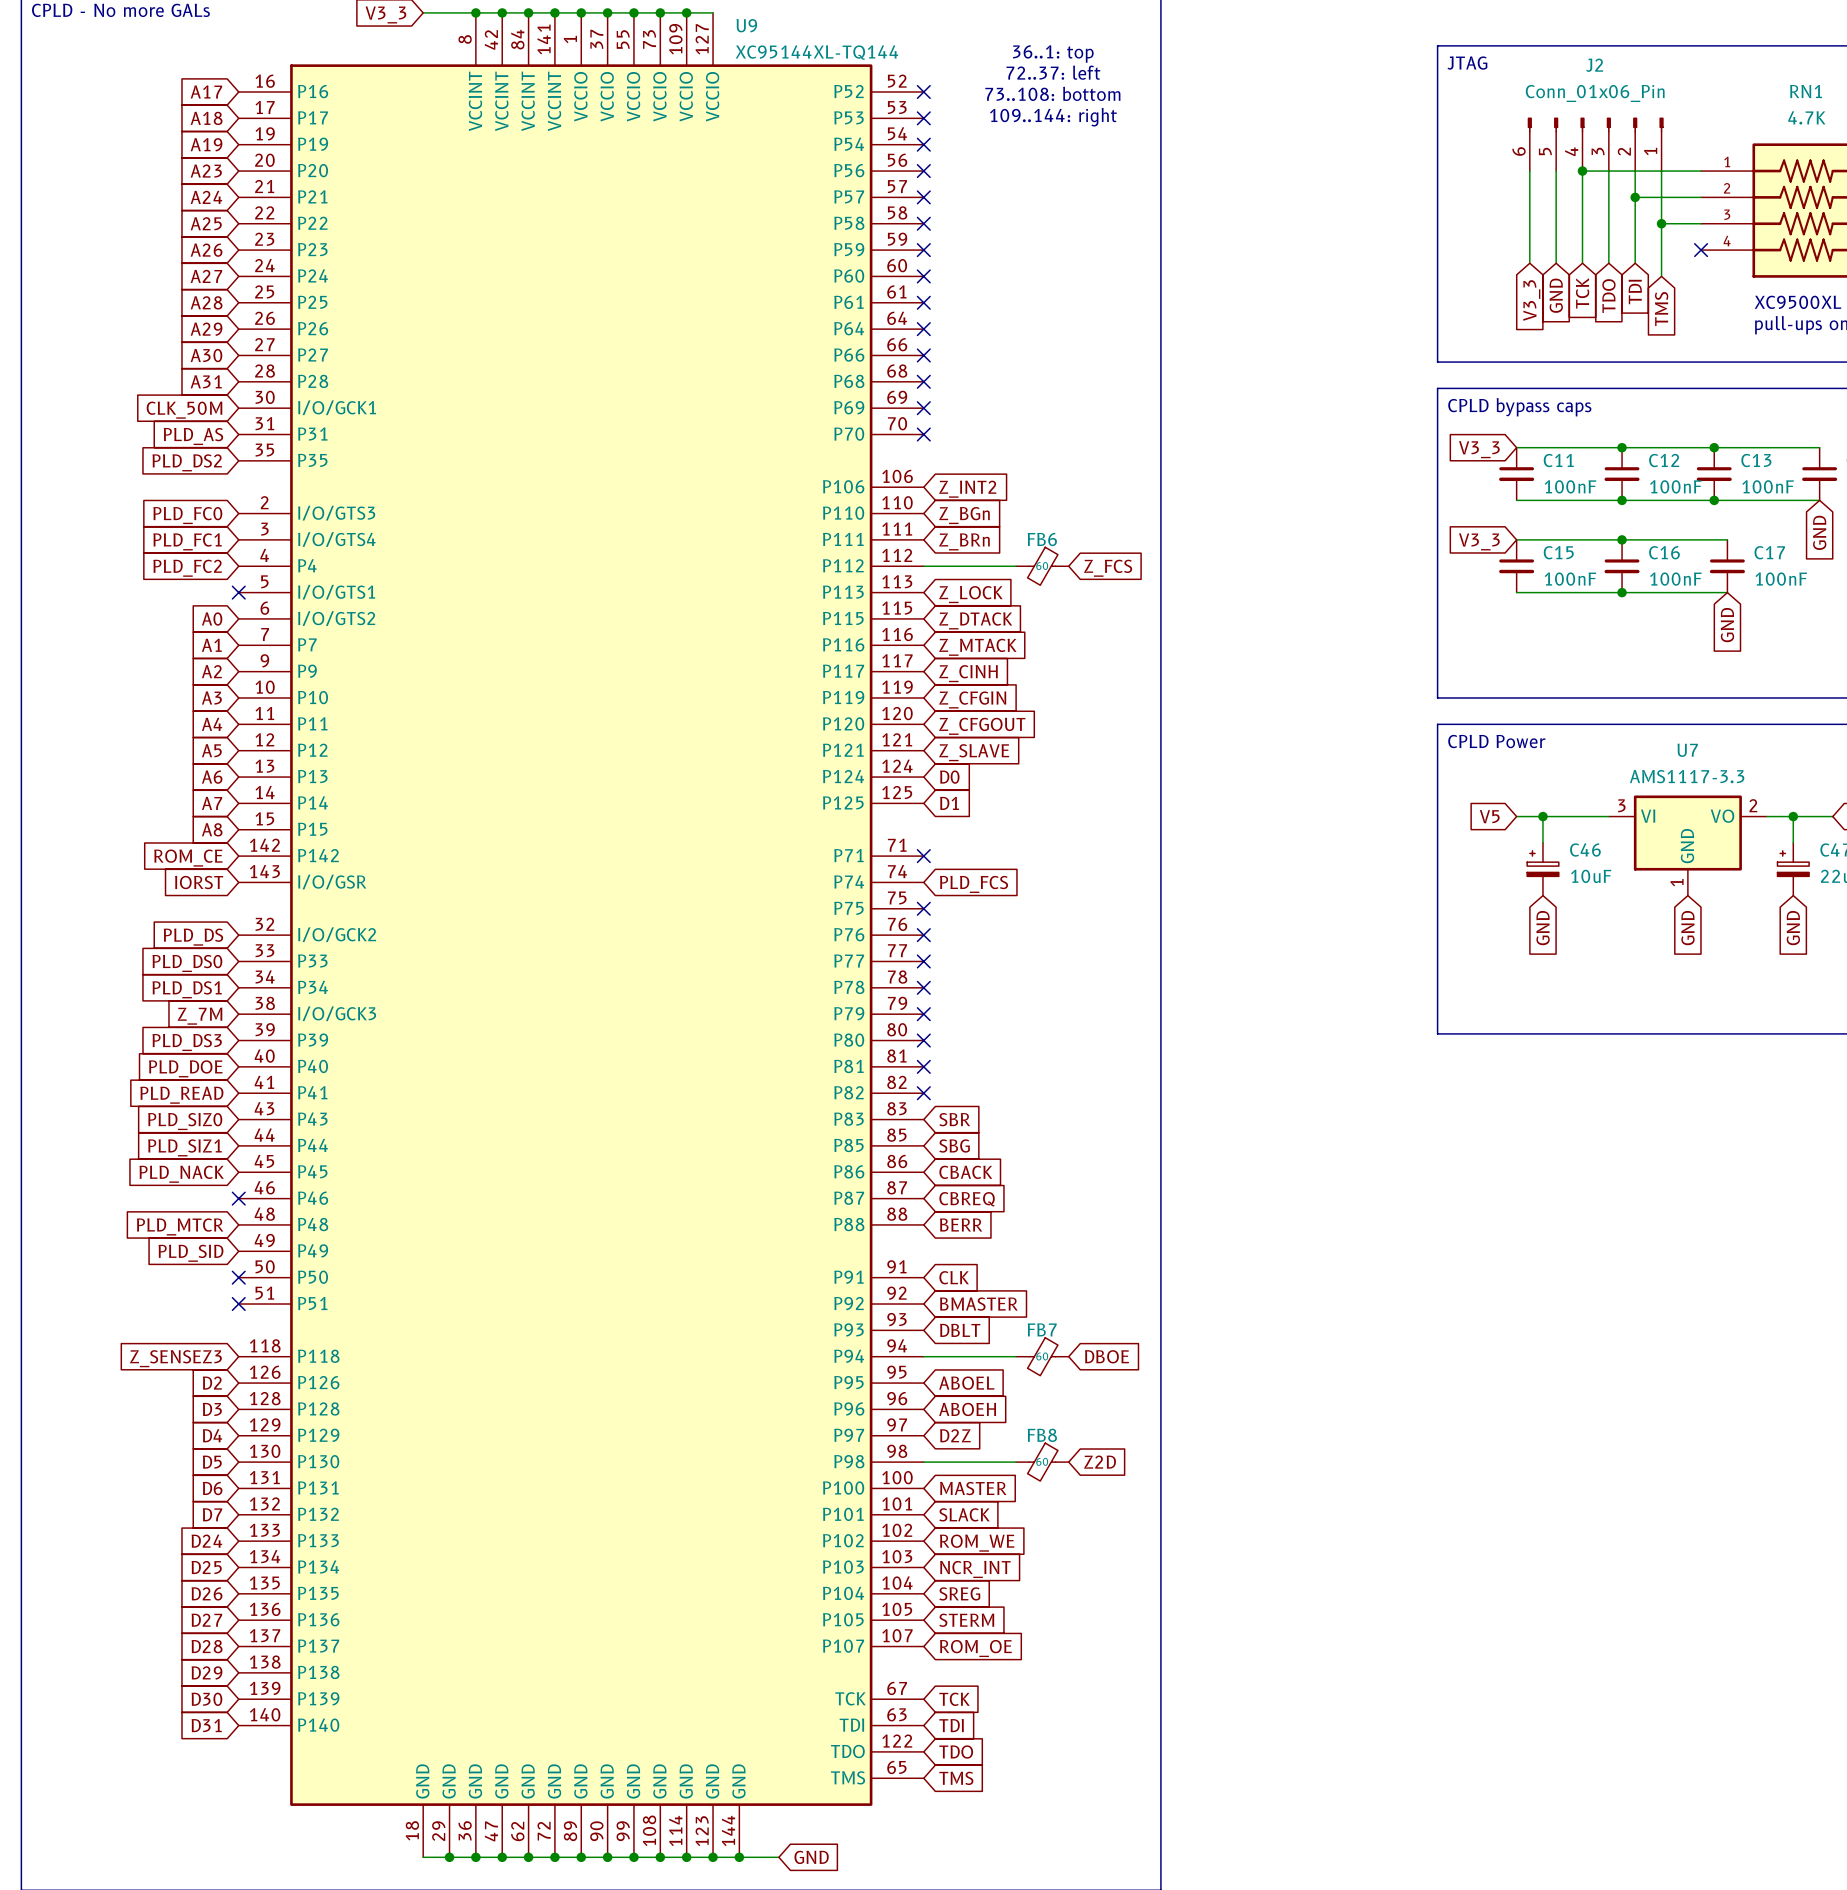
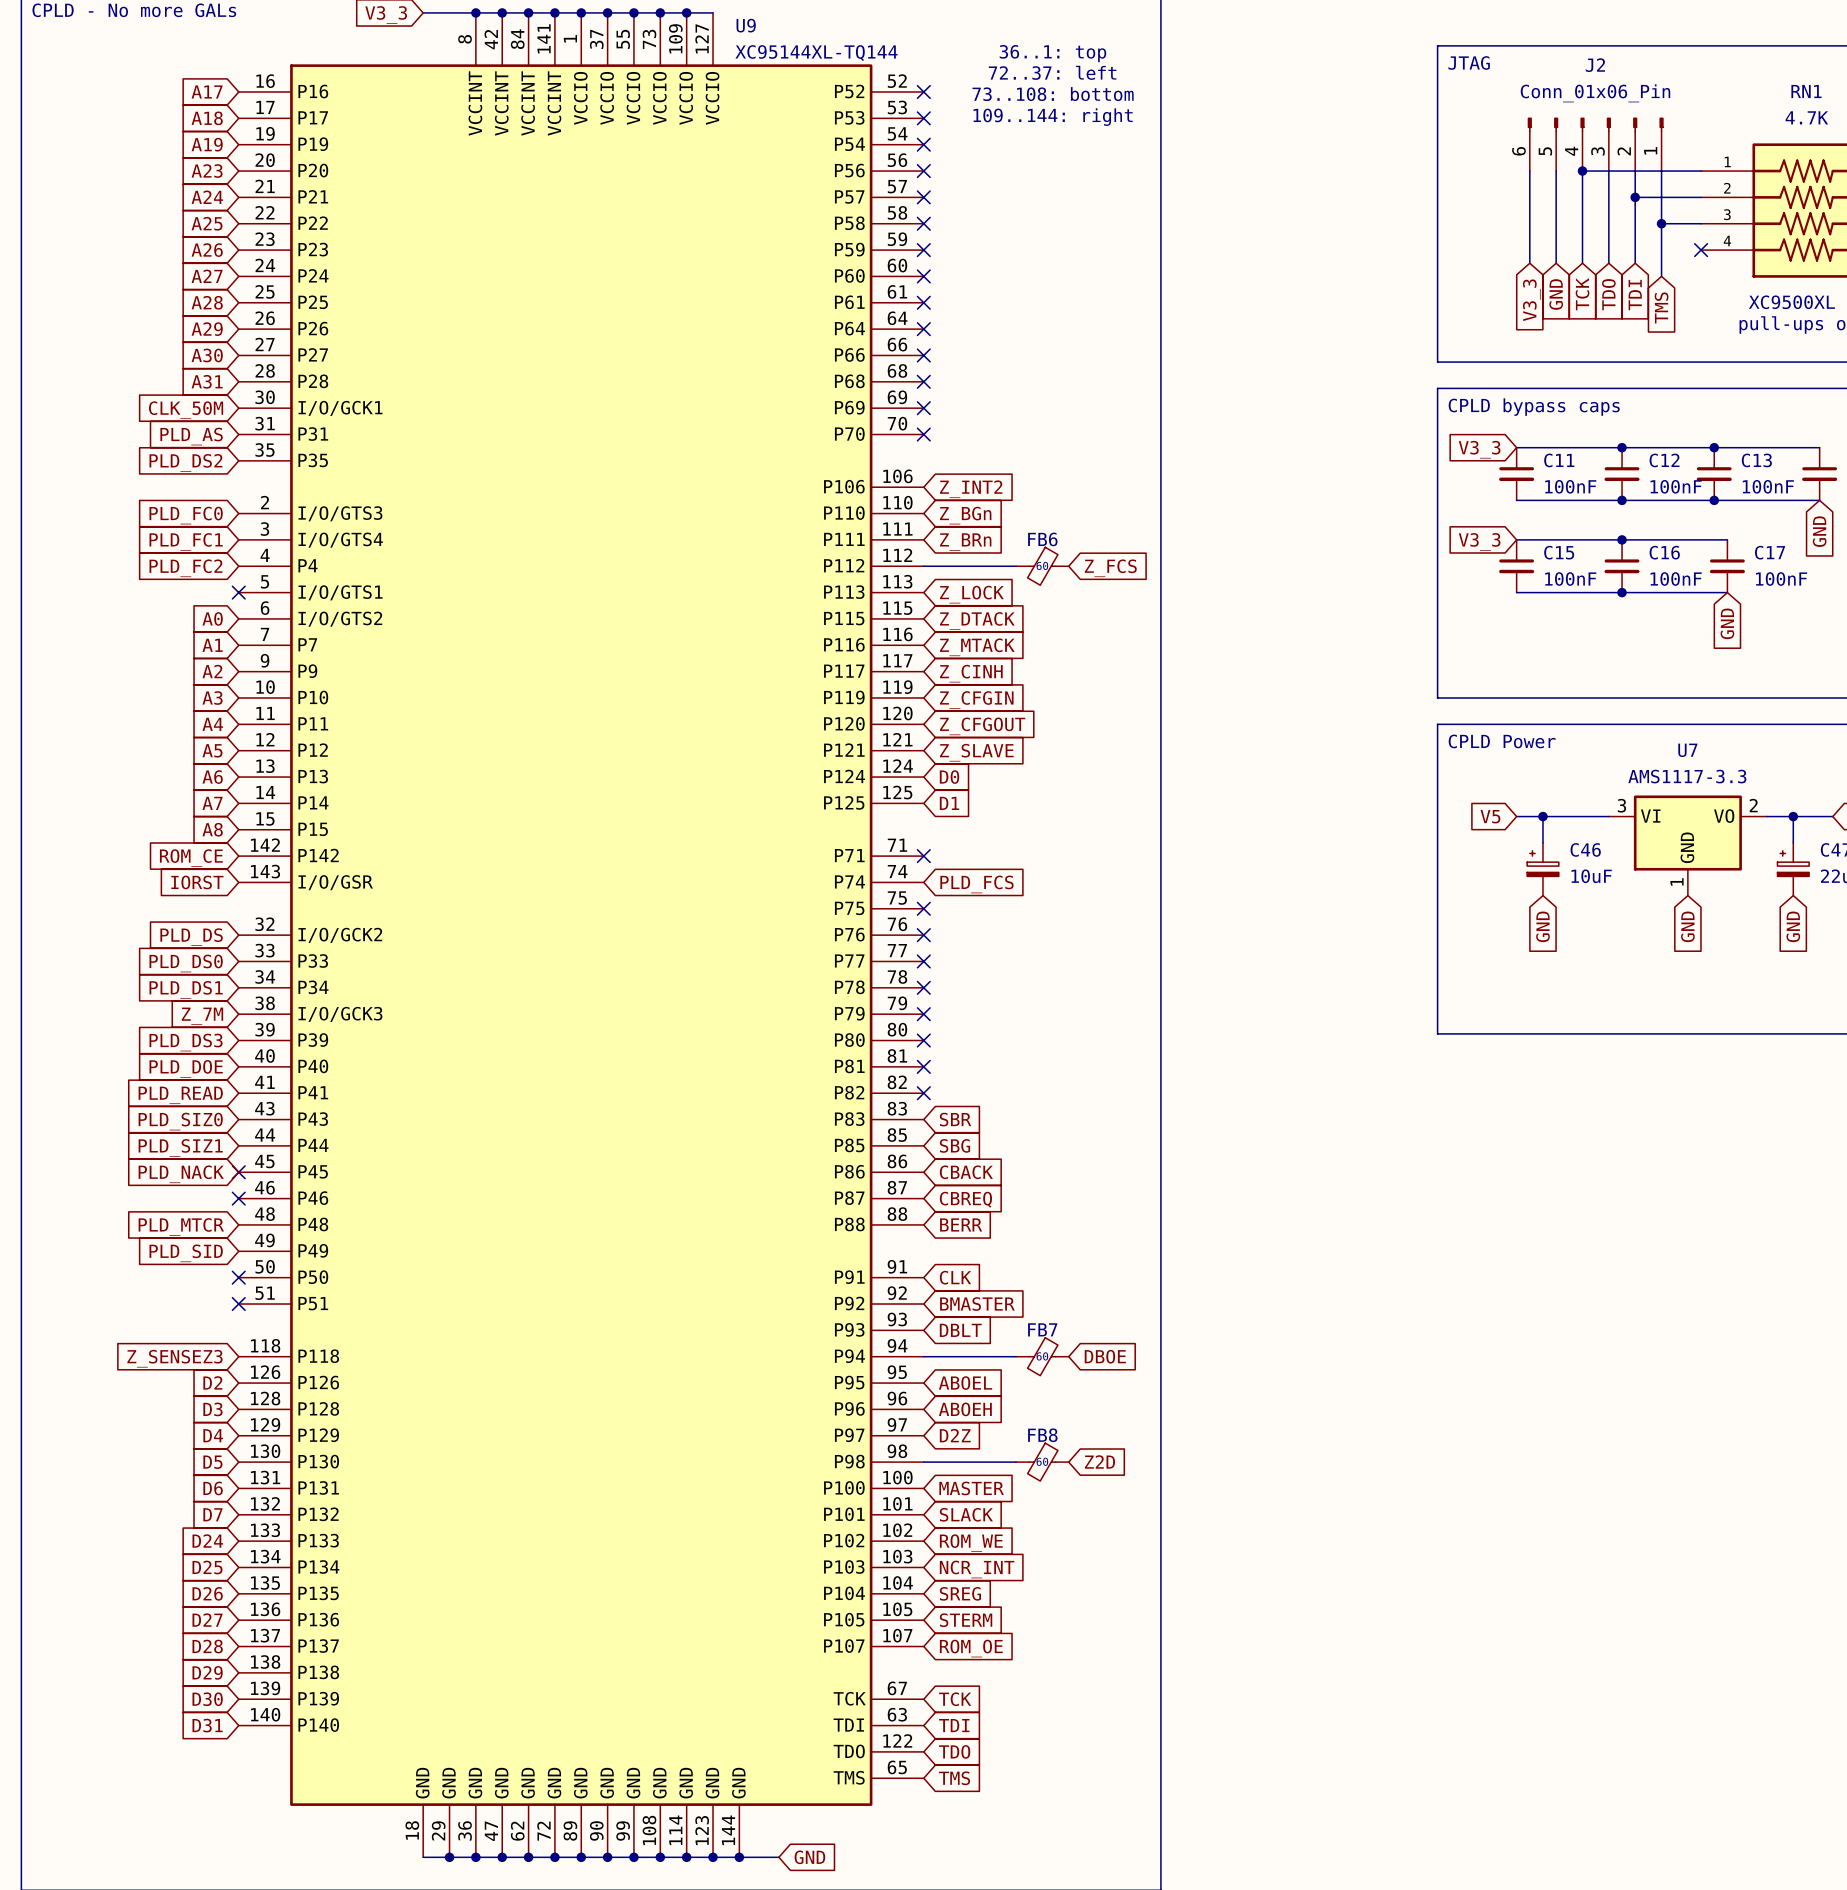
no-connect mark: none -> (238, 1172)

